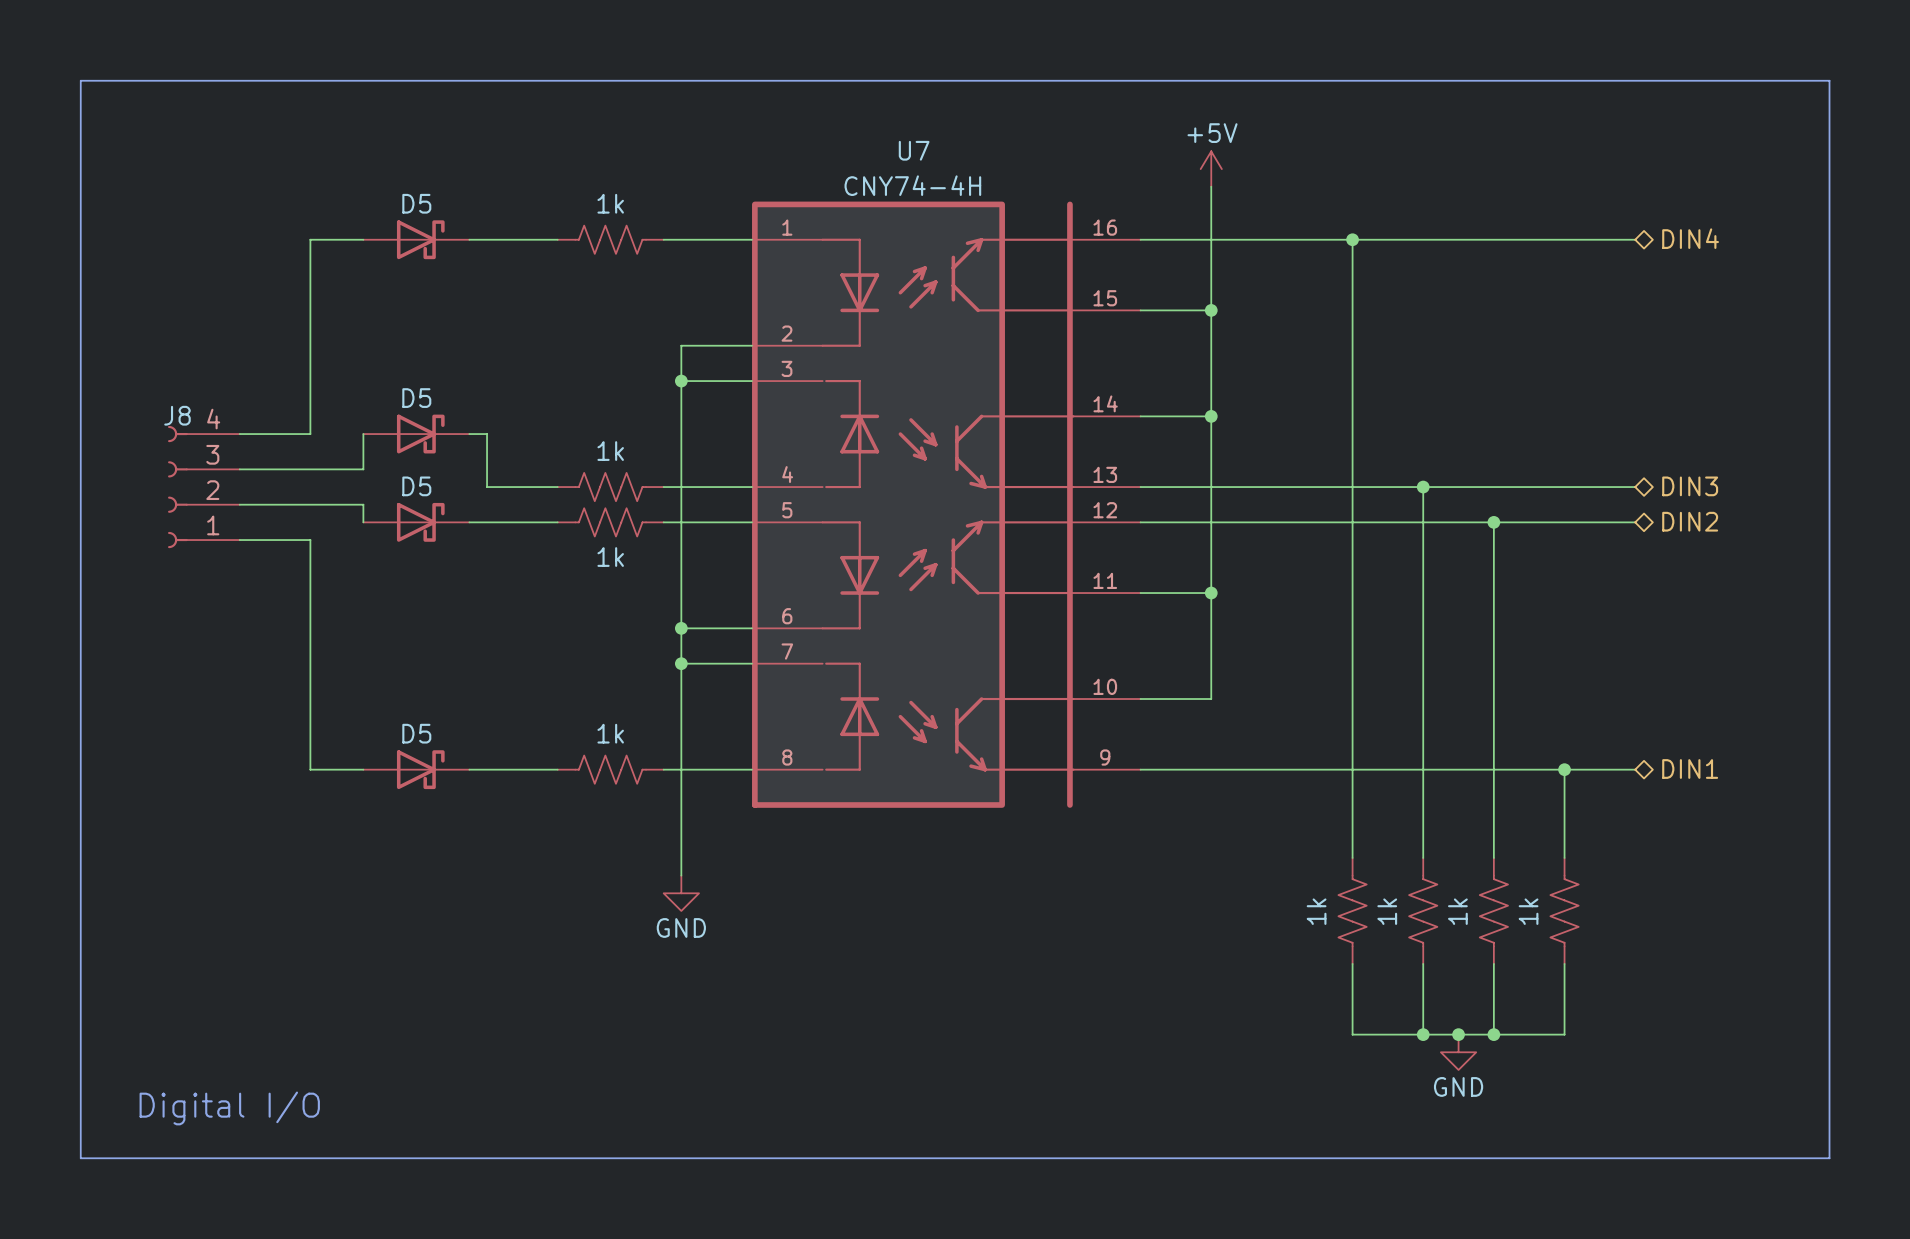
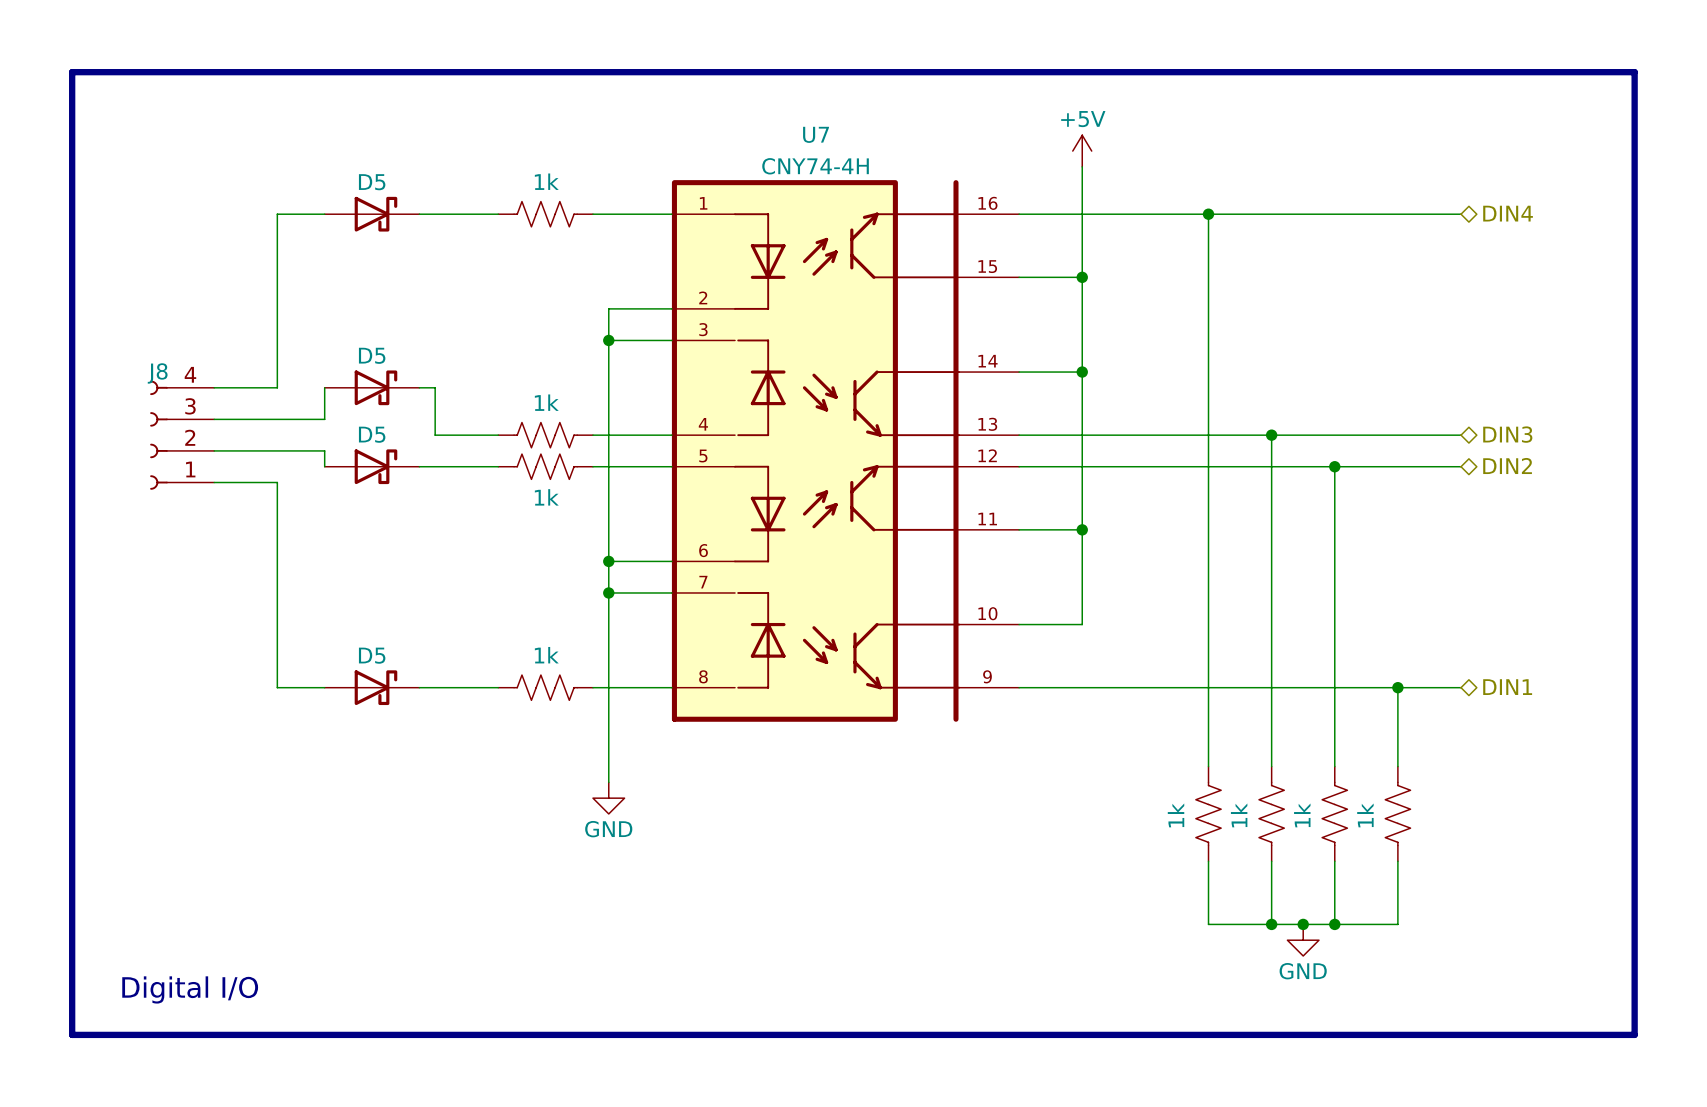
line width: thin (80, 80) (1829, 80) (1829, 1158) (80, 1158) (80, 80) -> thick (72, 72) (1634, 72) (1634, 1034) (72, 1034) (72, 72)

